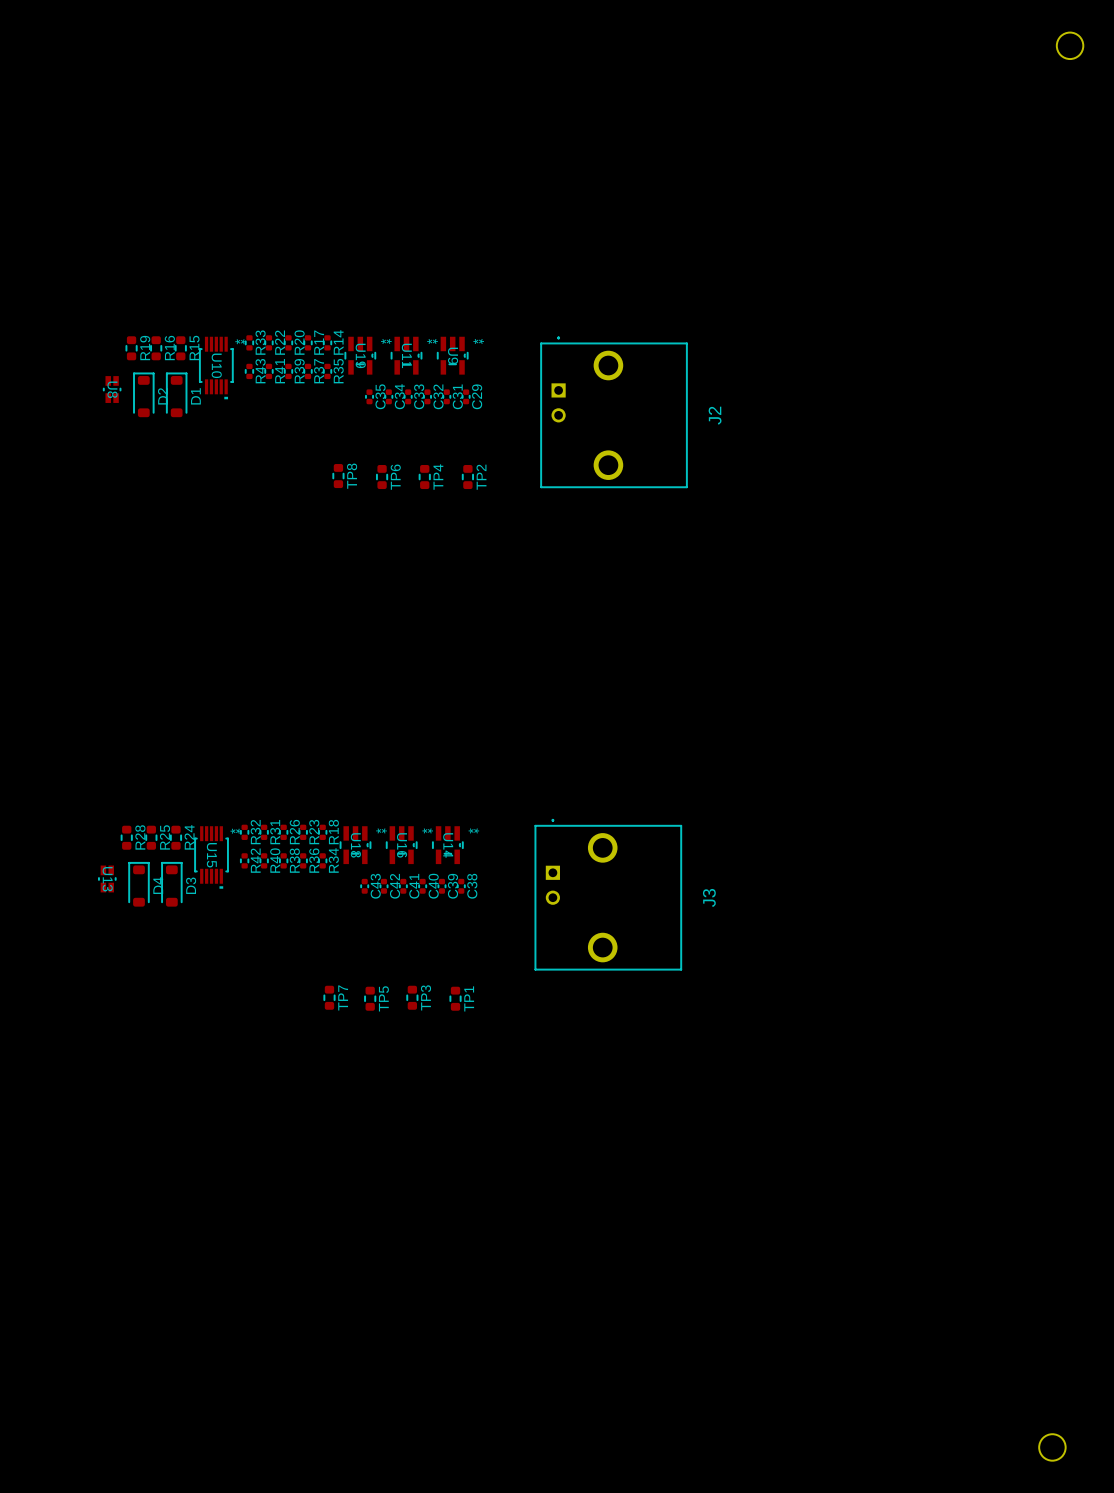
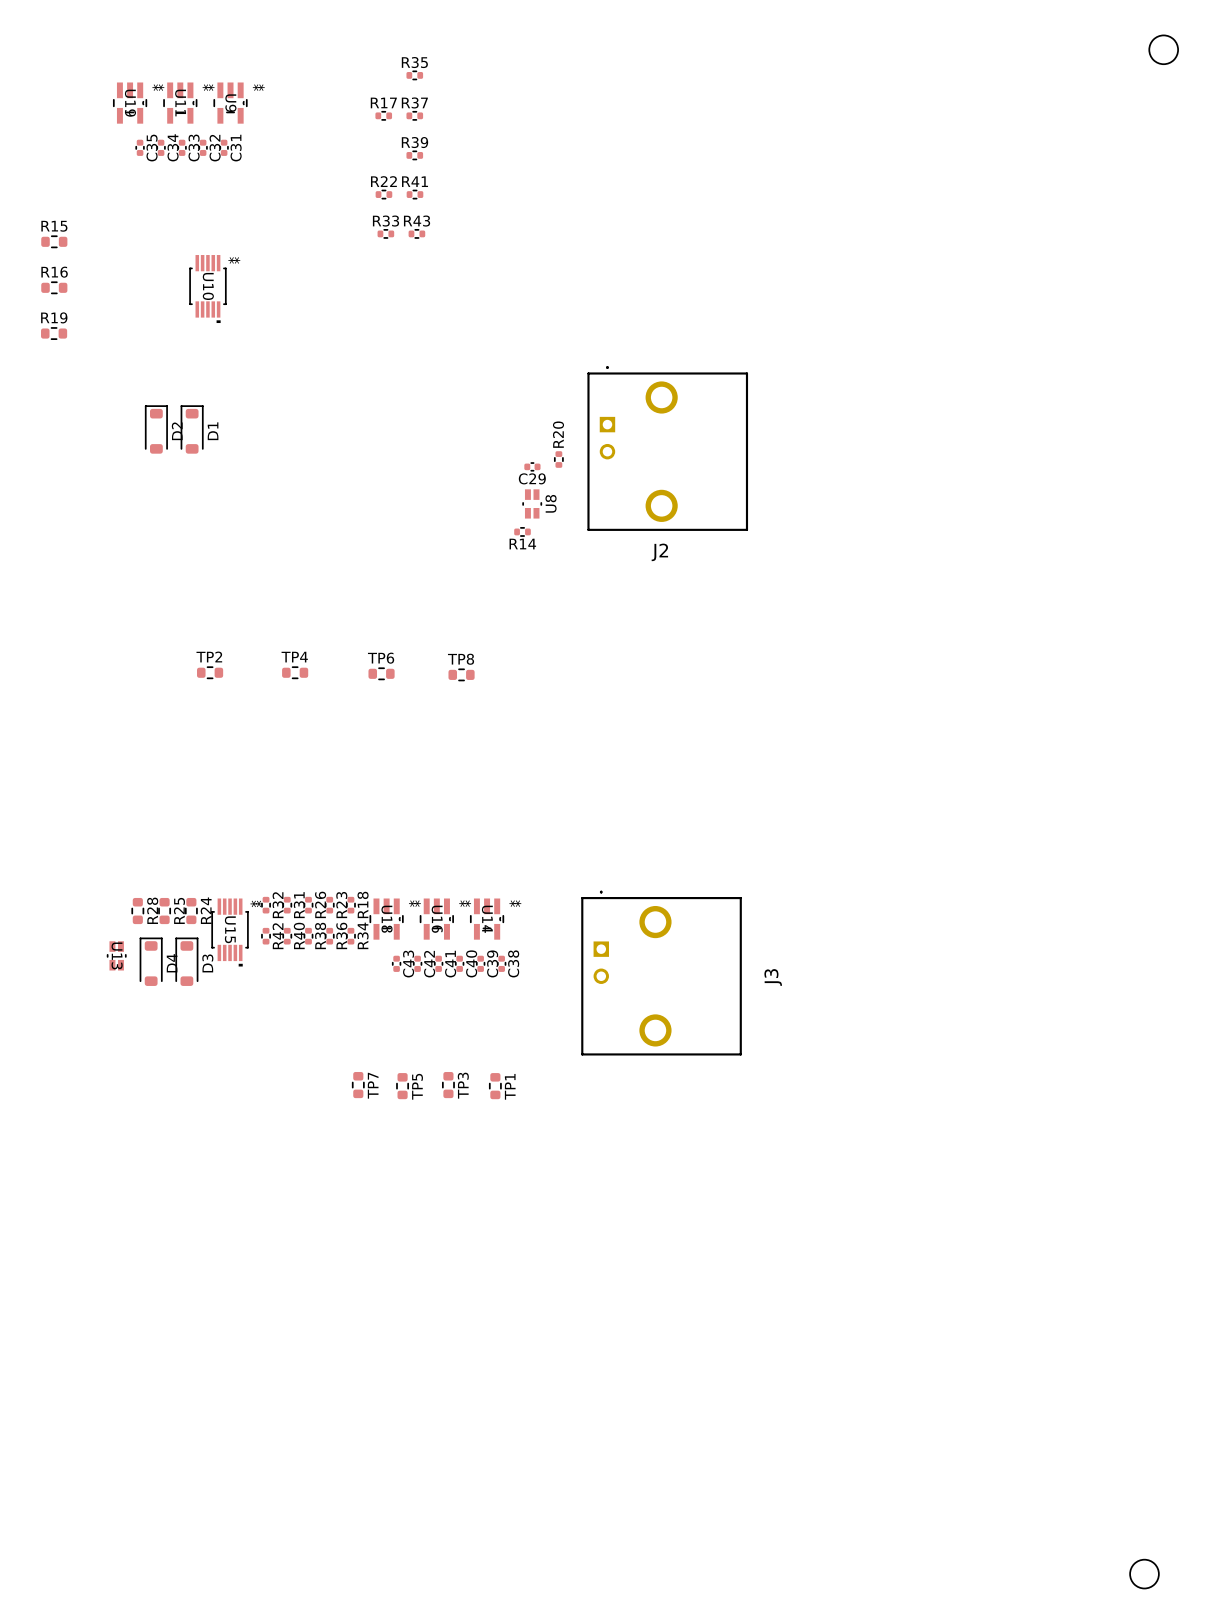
R33 rotation: 0° (249, 342) -> 90° clockwise (385, 233)
R33 position: (249, 342) -> (385, 233)
R22 rotation: 0° (268, 342) -> 90° clockwise (383, 194)
R22 position: (268, 342) -> (383, 194)
R20 position: (288, 342) -> (558, 459)
R20 name position: R20 (299, 342) -> R20 (558, 434)
R17 rotation: 0° (308, 342) -> 90° clockwise (383, 115)
R17 position: (308, 342) -> (383, 115)
R14 rotation: 0° (327, 342) -> 90° clockwise (522, 531)
R14 position: (327, 342) -> (522, 531)
R15 name position: R15 (194, 347) -> R15 (54, 226)
R19 rotation: 0° (131, 348) -> 90° clockwise (54, 333)
R19 position: (131, 348) -> (54, 333)
R19 name position: R19 (145, 348) -> R19 (54, 317)
R16 rotation: 0° (156, 348) -> 90° clockwise (54, 287)
R16 position: (156, 348) -> (54, 287)
R16 name position: R16 (169, 348) -> R16 (54, 272)
R15 rotation: 0° (180, 348) -> 90° clockwise (54, 241)
R15 position: (180, 348) -> (54, 241)
U19 position: (360, 355) -> (130, 103)
U11 position: (406, 355) -> (180, 103)
U9 position: (452, 355) -> (230, 103)
U10 position: (216, 368) -> (207, 289)
R43 rotation: 0° (249, 371) -> 90° clockwise (416, 233)
R43 position: (249, 371) -> (416, 233)
R41 rotation: 0° (268, 371) -> 90° clockwise (414, 194)
R41 position: (268, 371) -> (414, 194)
R39 rotation: 0° (288, 371) -> 90° clockwise (414, 155)
R39 position: (288, 371) -> (414, 155)
R37 rotation: 0° (308, 371) -> 90° clockwise (414, 115)
R37 position: (308, 371) -> (414, 115)
R35 rotation: 0° (327, 371) -> 90° clockwise (414, 75)
R35 position: (327, 371) -> (414, 75)
U8 position: (112, 389) -> (532, 503)
U8 name rotation: 0° (112, 389) -> 180° (551, 503)
C35 position: (369, 396) -> (140, 147)
C34 position: (388, 396) -> (161, 147)
C33 position: (408, 396) -> (182, 147)
C32 position: (427, 396) -> (203, 147)
C31 position: (446, 396) -> (224, 147)
C29 rotation: 0° (466, 396) -> 90° clockwise (532, 466)
C29 position: (466, 396) -> (532, 466)
J2 name rotation: 0° (715, 415) -> 90° clockwise (659, 552)
J2 name position: J2 (715, 415) -> J2 (659, 552)
TP8 rotation: 0° (338, 476) -> 90° clockwise (461, 674)
TP8 position: (338, 476) -> (461, 674)
TP8 name position: TP8 (352, 476) -> TP8 (461, 659)
TP6 rotation: 0° (382, 477) -> 90° clockwise (381, 673)
TP6 position: (382, 477) -> (381, 673)
TP6 name position: TP6 (395, 477) -> TP6 (381, 658)
TP4 rotation: 0° (424, 477) -> 90° clockwise (295, 672)
TP4 position: (424, 477) -> (295, 672)
TP4 name position: TP4 (438, 477) -> TP4 (294, 657)
TP2 rotation: 0° (467, 477) -> 90° clockwise (210, 672)
TP2 position: (467, 477) -> (210, 672)
TP2 name position: TP2 (481, 477) -> TP2 (209, 657)

